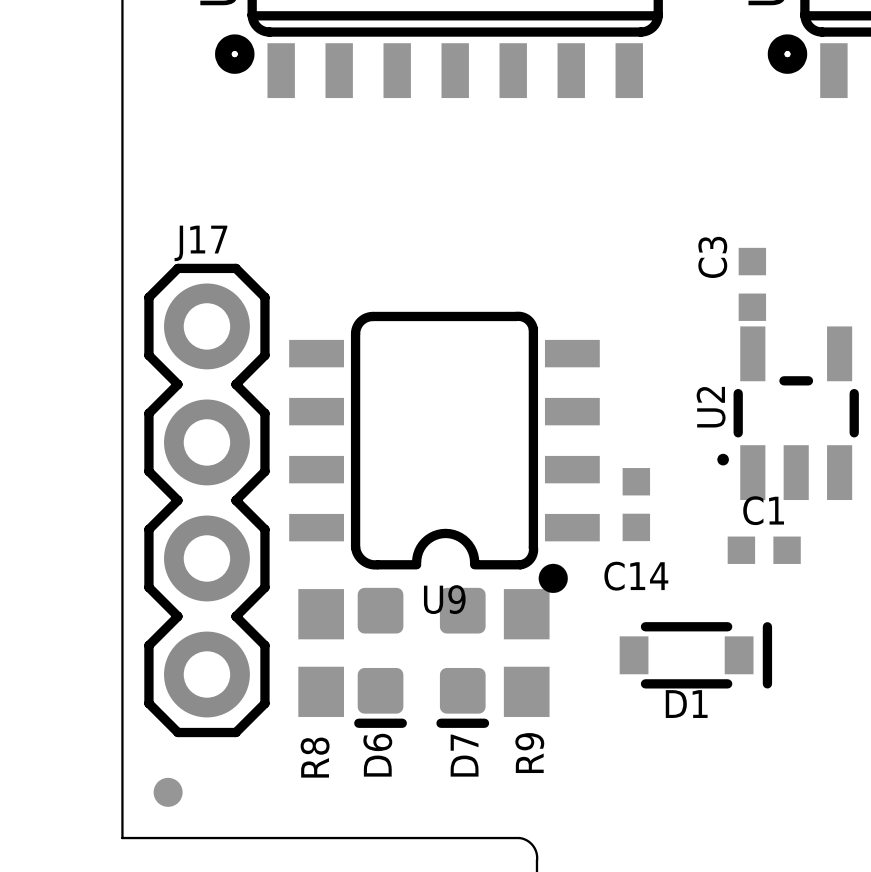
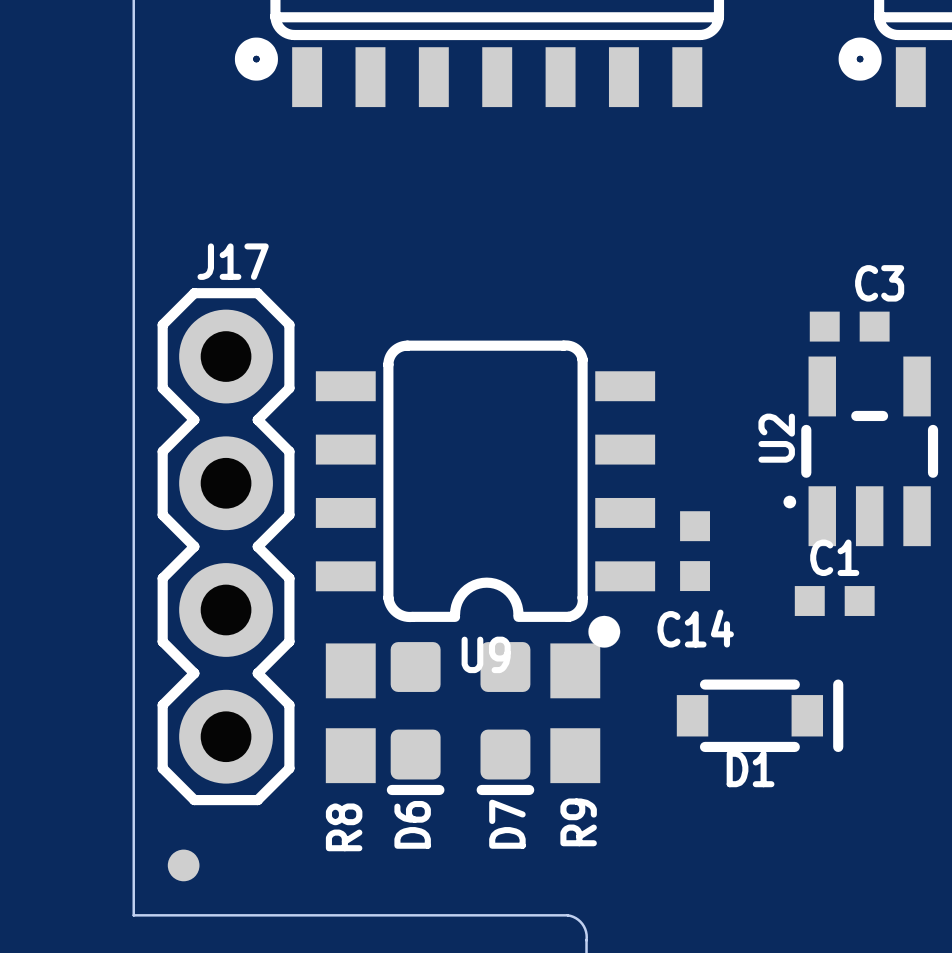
C3 rotation: 0° (752, 284) -> 90° clockwise (849, 326)

